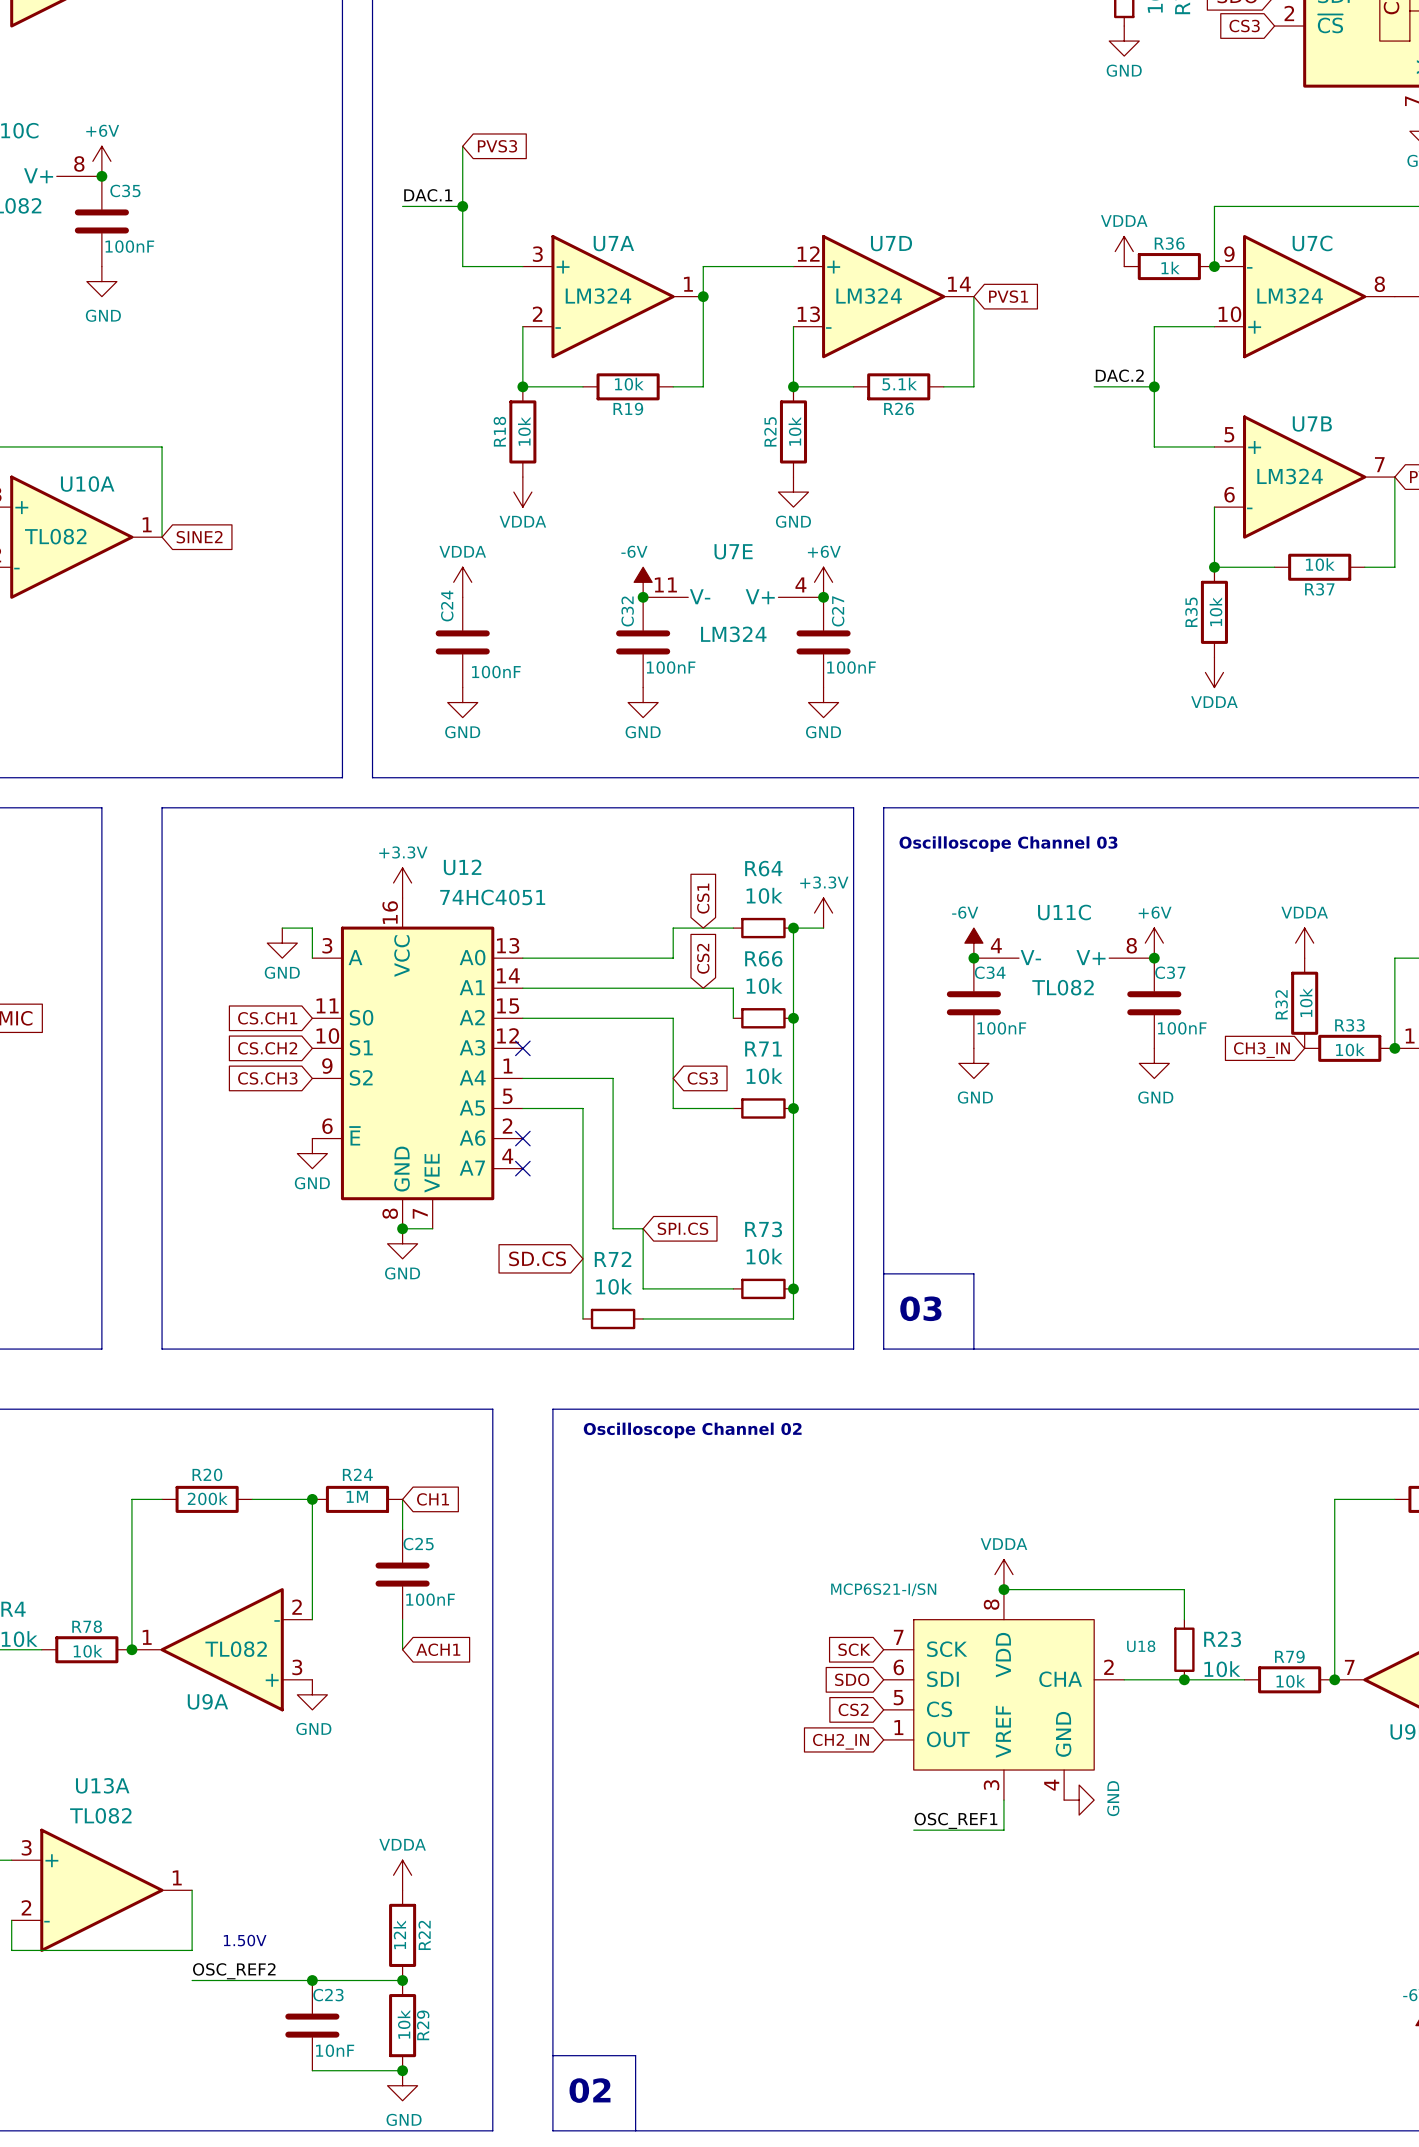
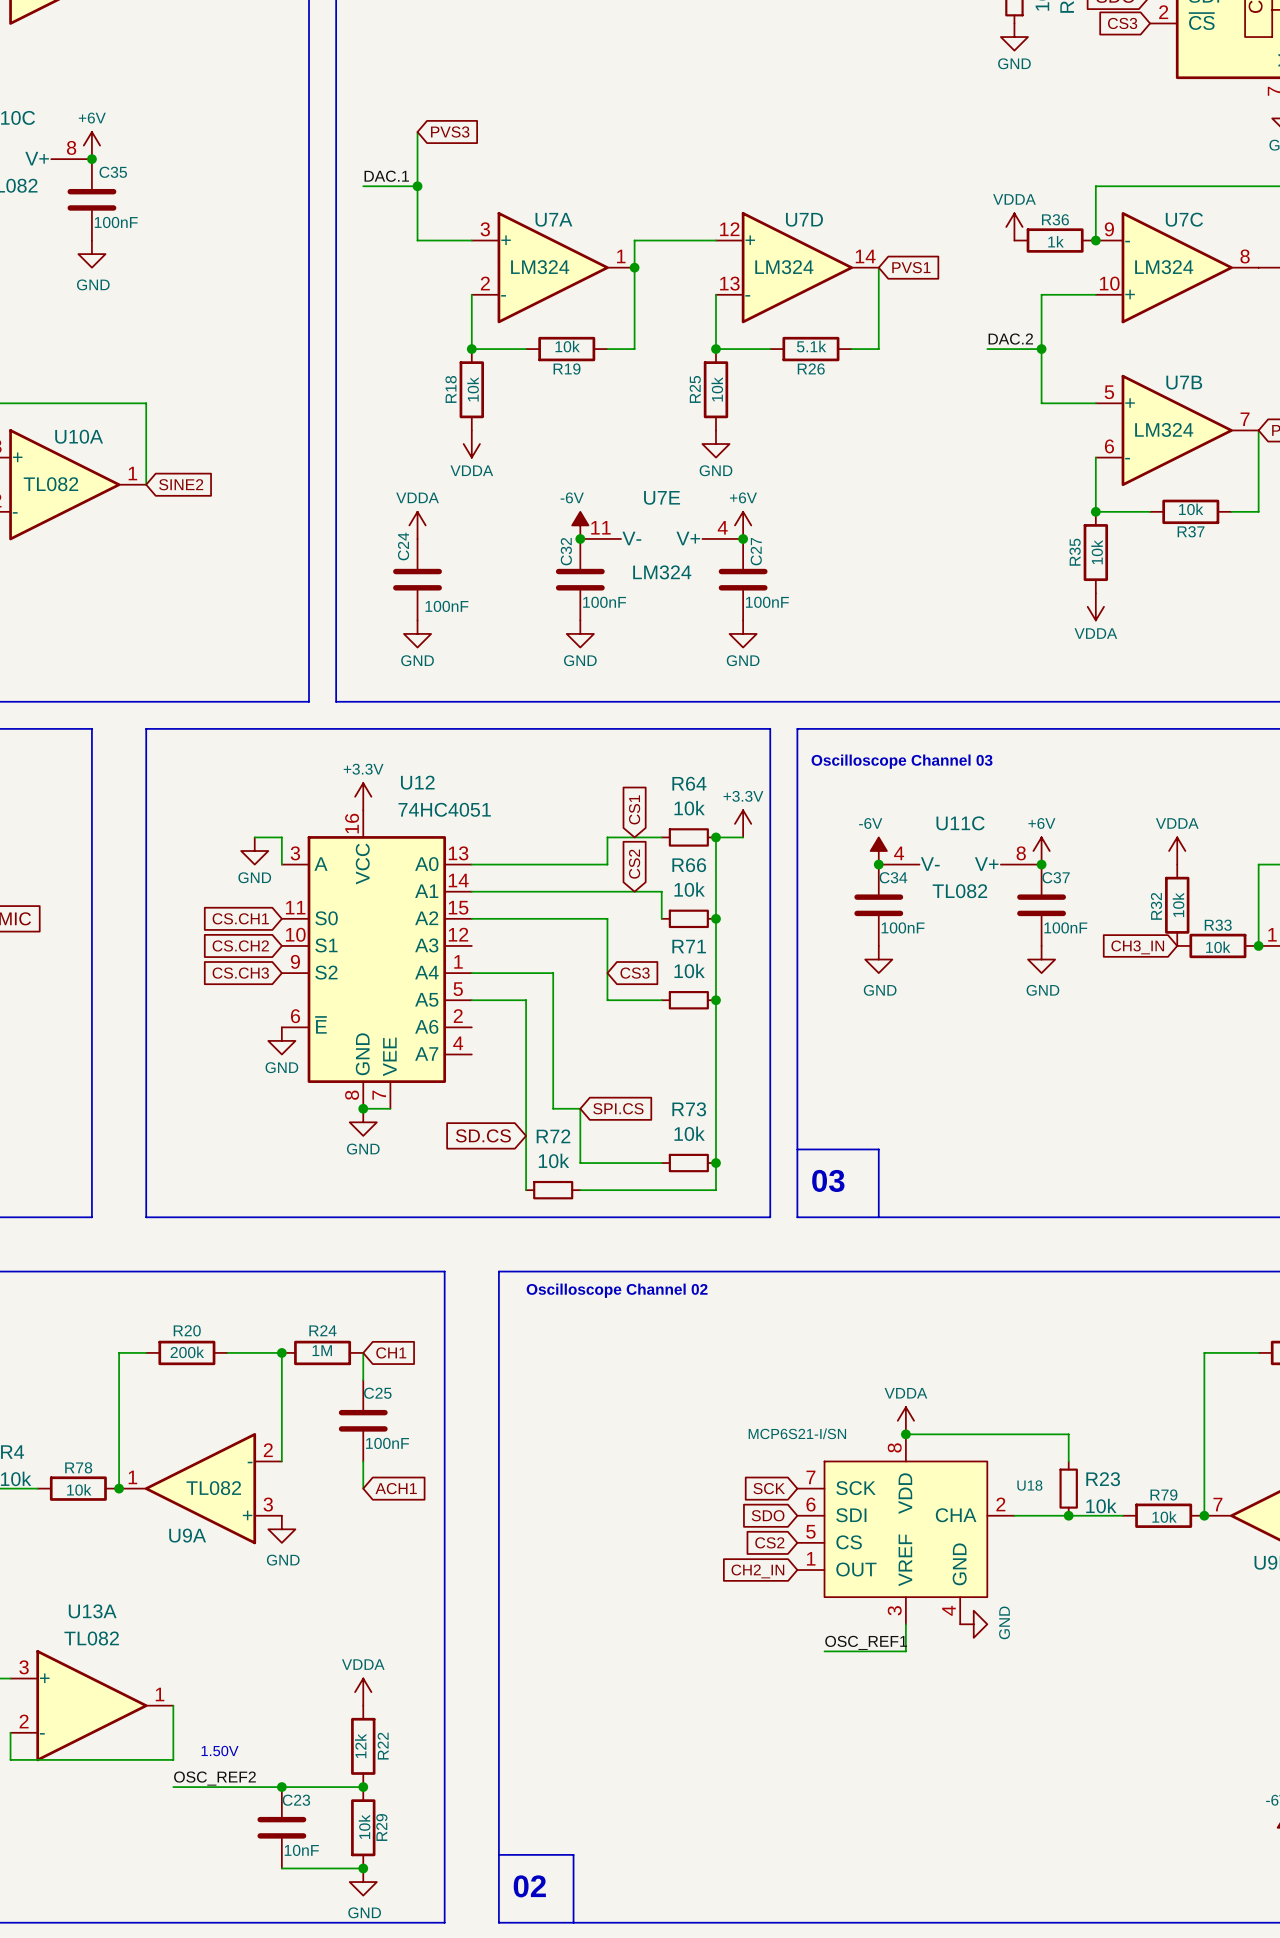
no-connect mark: (522, 1048) -> none
no-connect mark: (522, 1138) -> none
no-connect mark: (522, 1168) -> none

